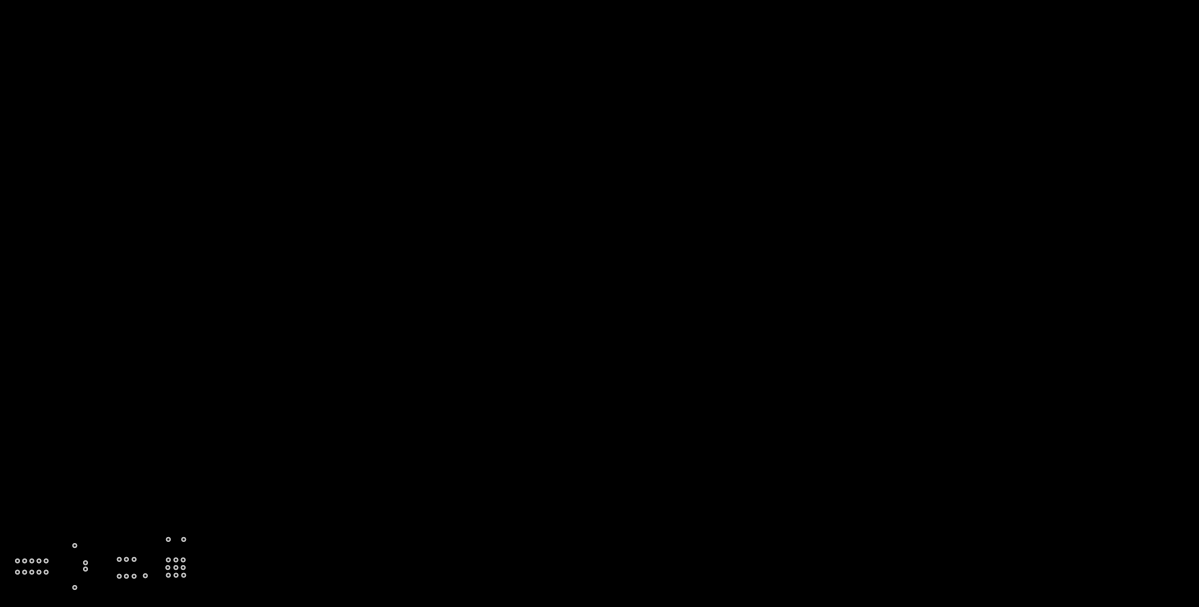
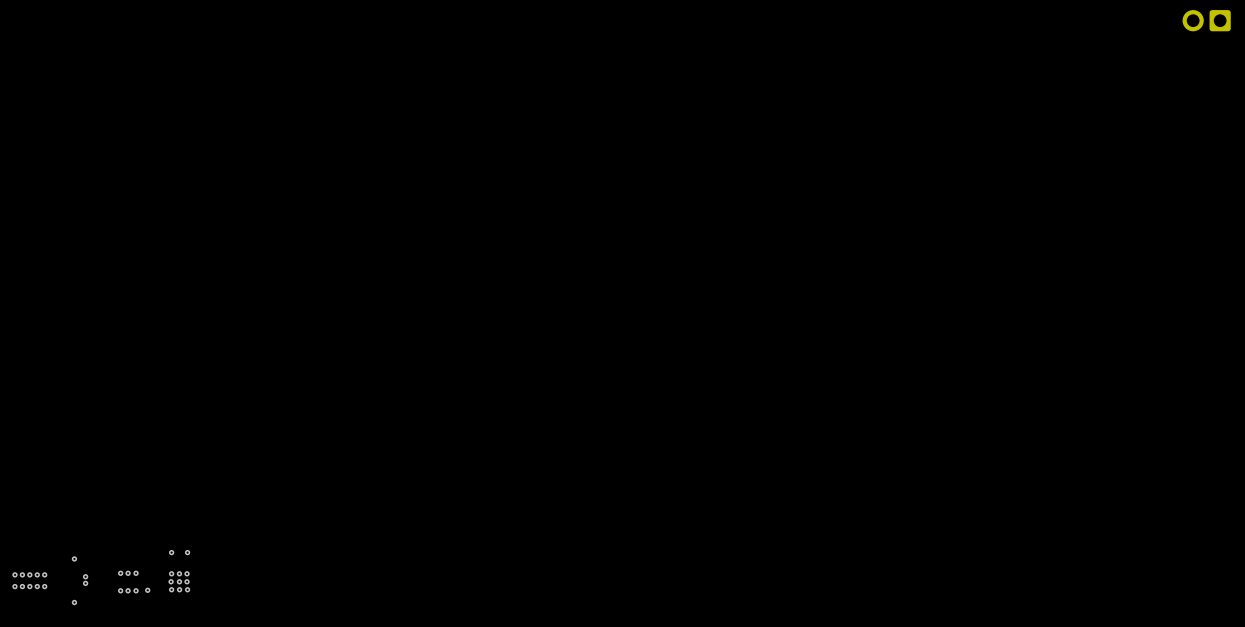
part: none -> (1206, 20)

